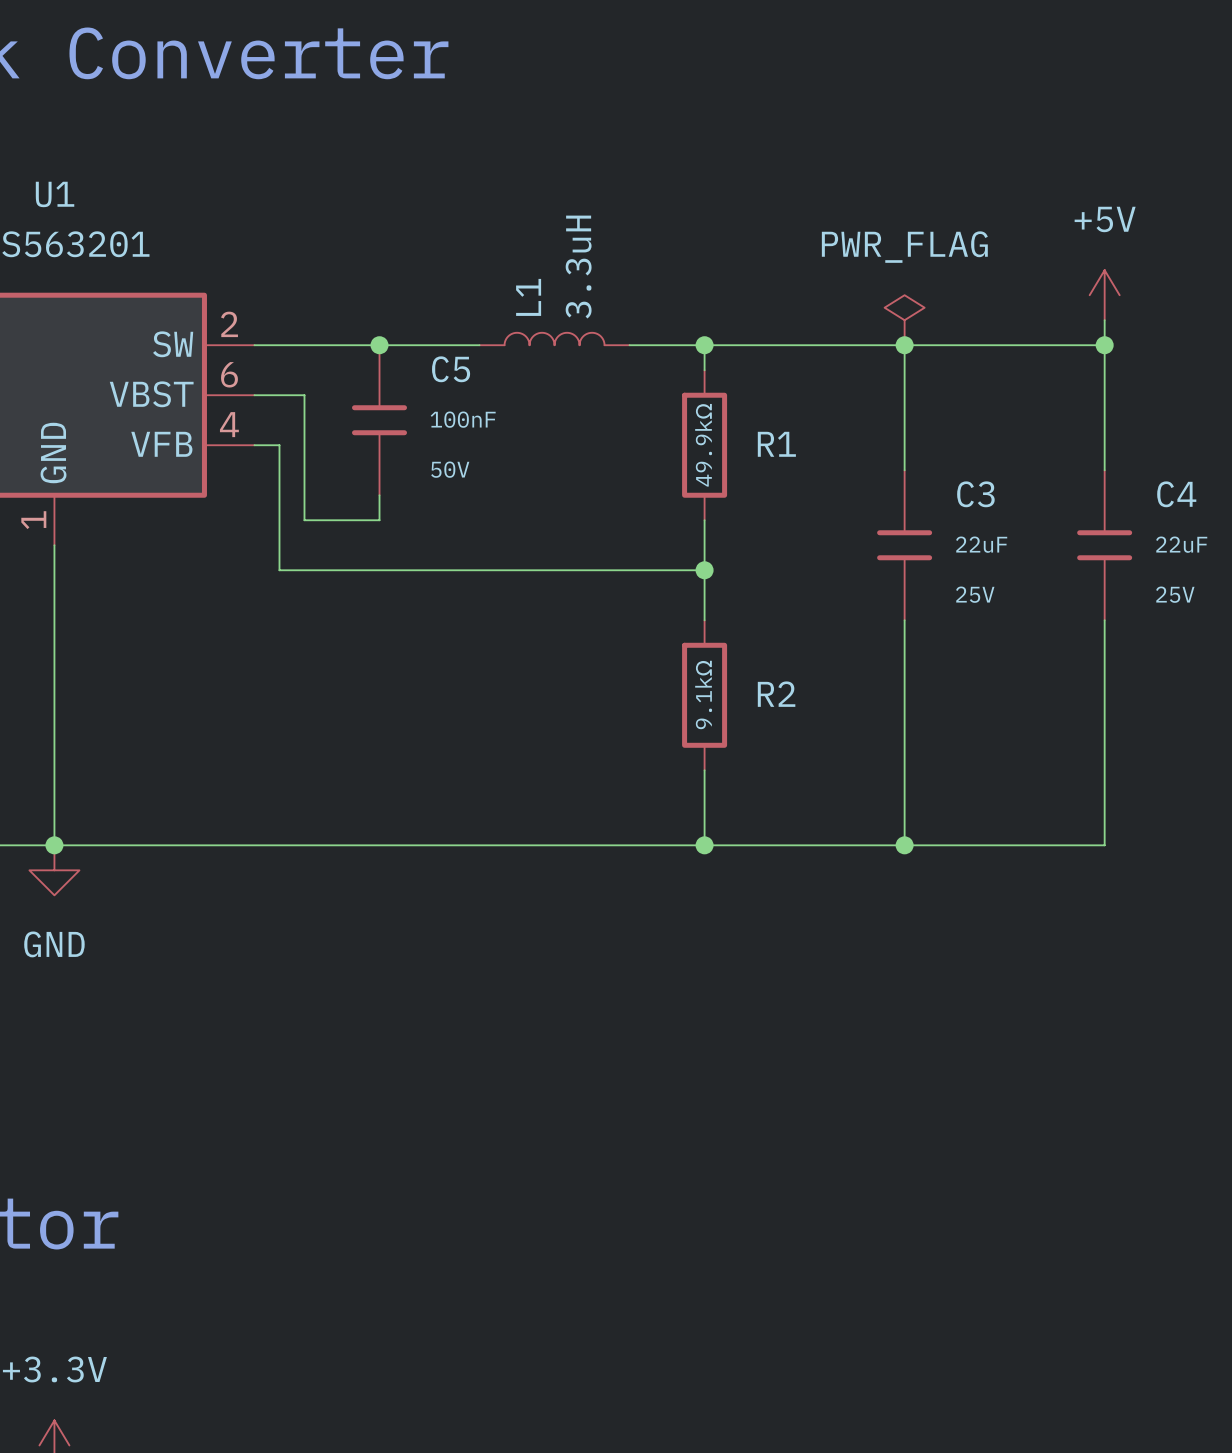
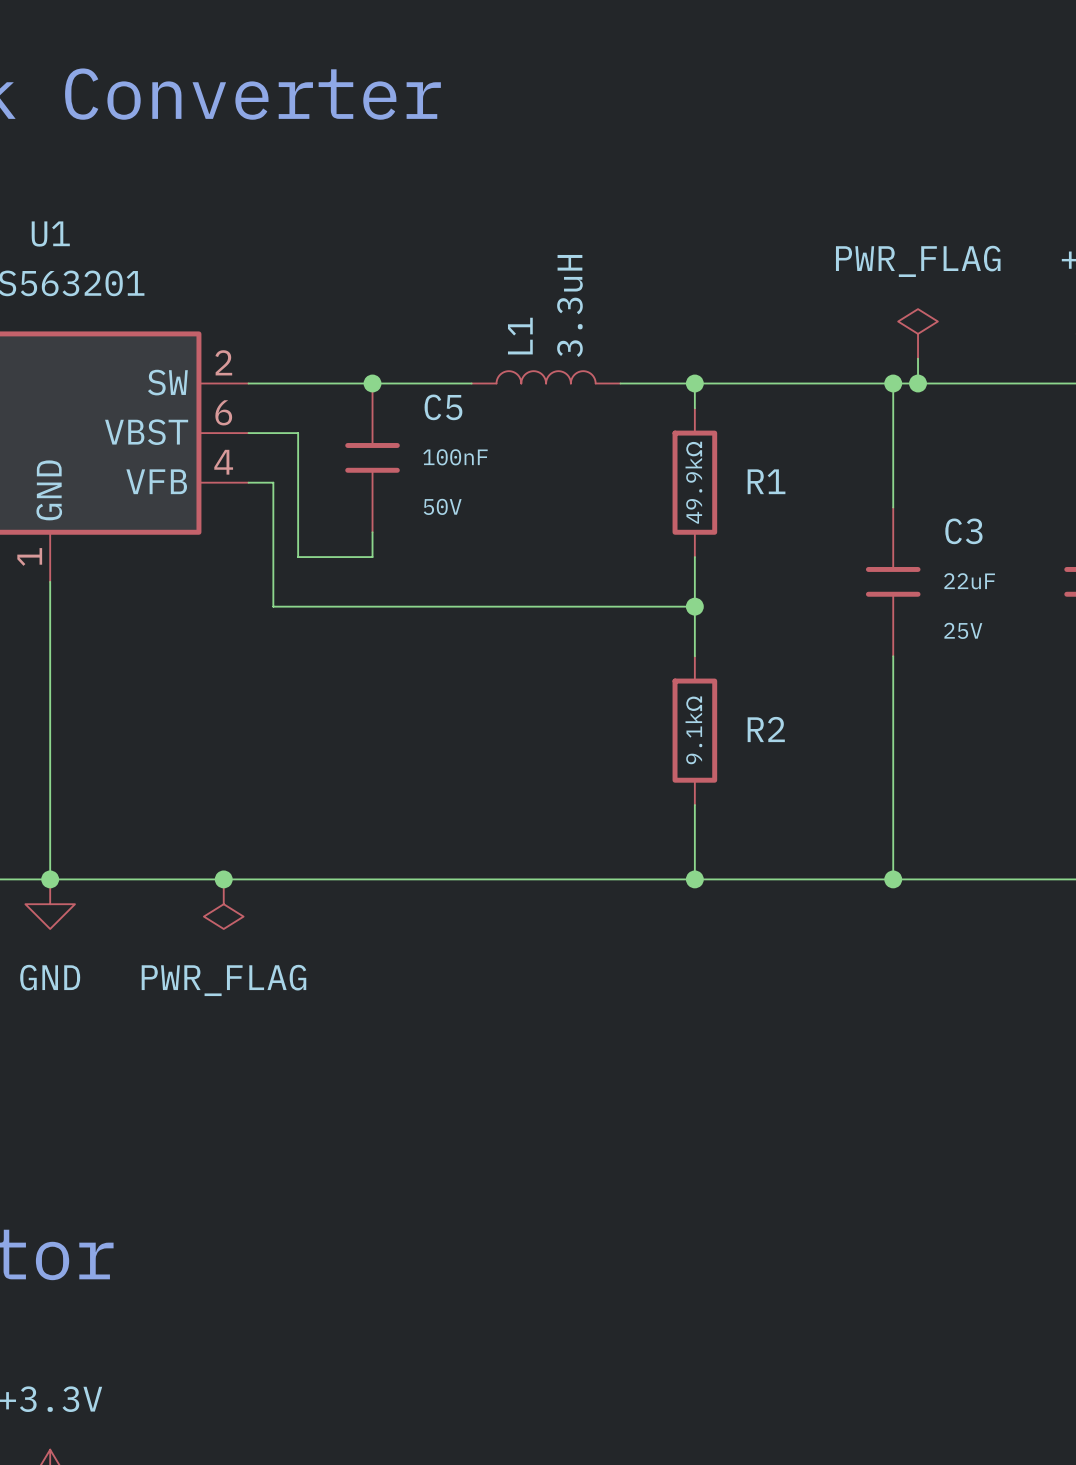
power symbol position: PWR_FLAG (904, 320) -> PWR_FLAG (918, 333)
wire: none -> (918, 358) (918, 383)
junction: none -> (918, 383)
junction: none -> (223, 879)
power symbol: none -> PWR_FLAG (223, 904)

